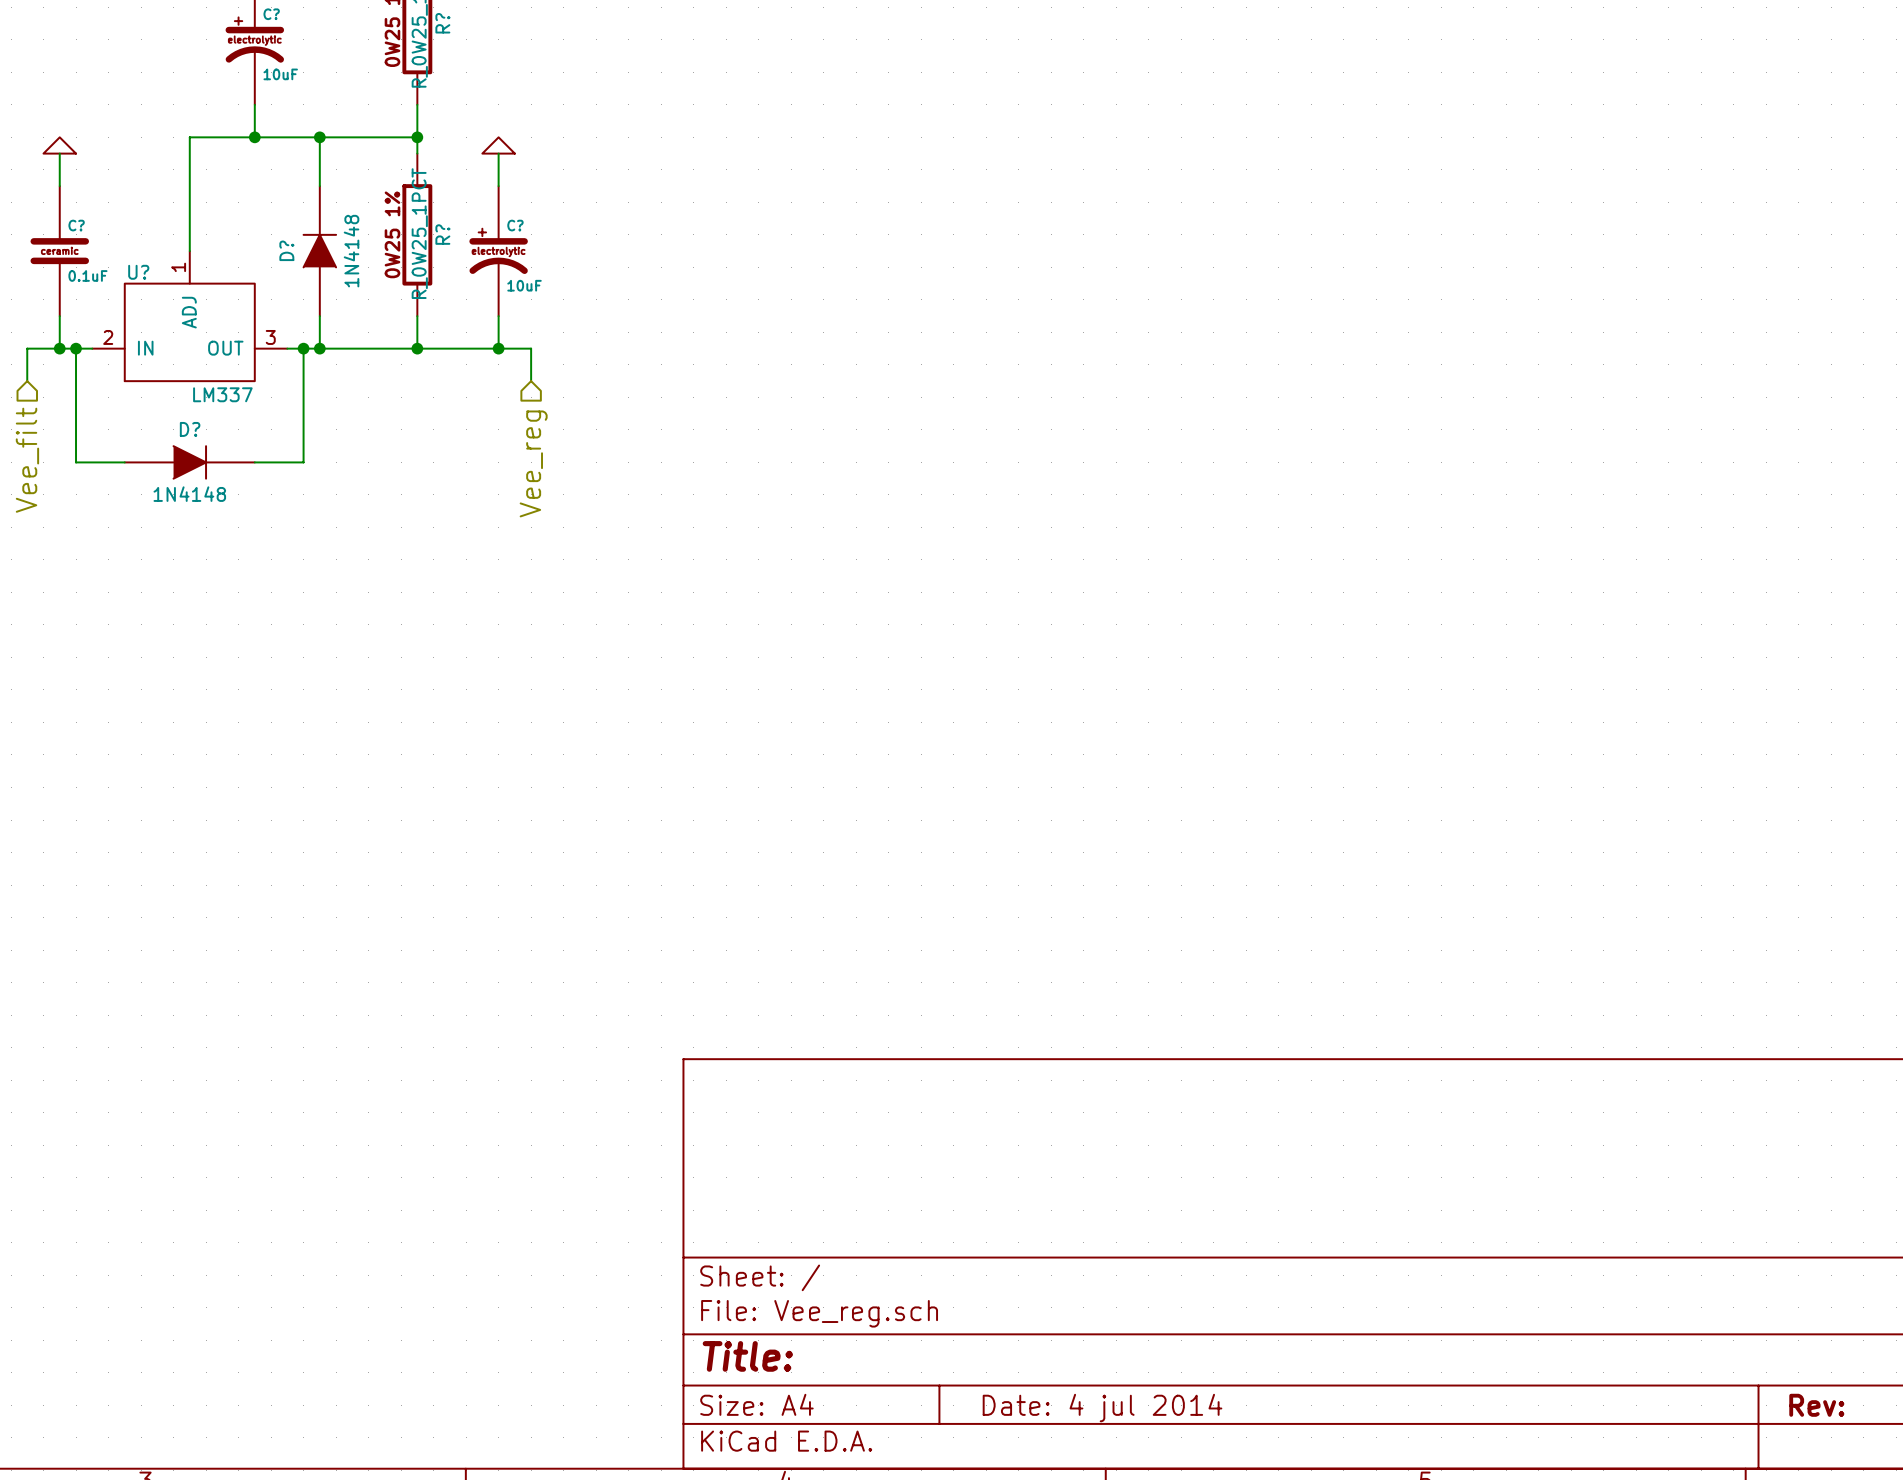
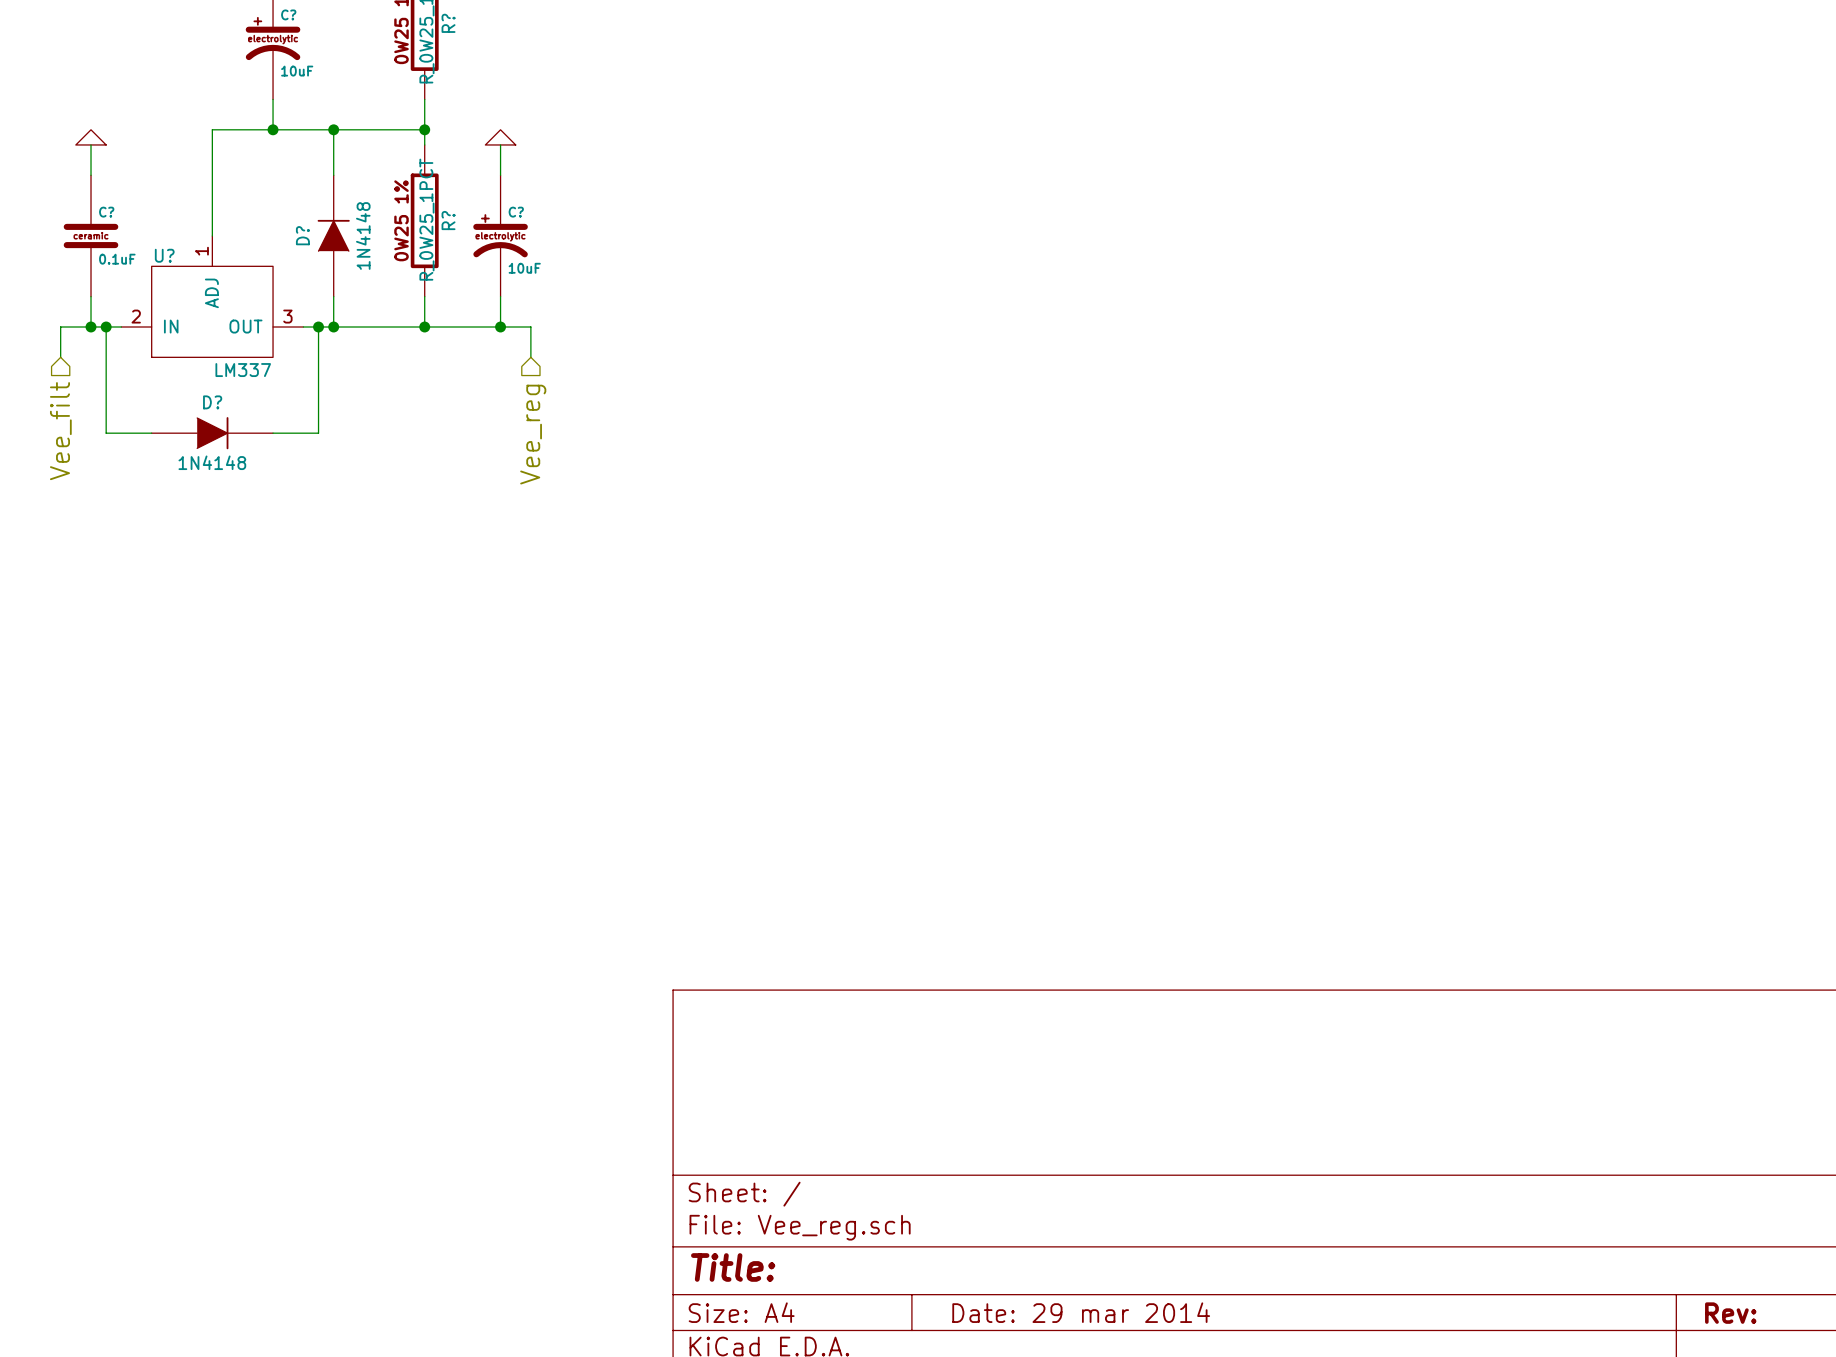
title block: Date: 4 jul 2014 (1102, 1408) -> Date: 29 mar 2014 (1081, 1312)

